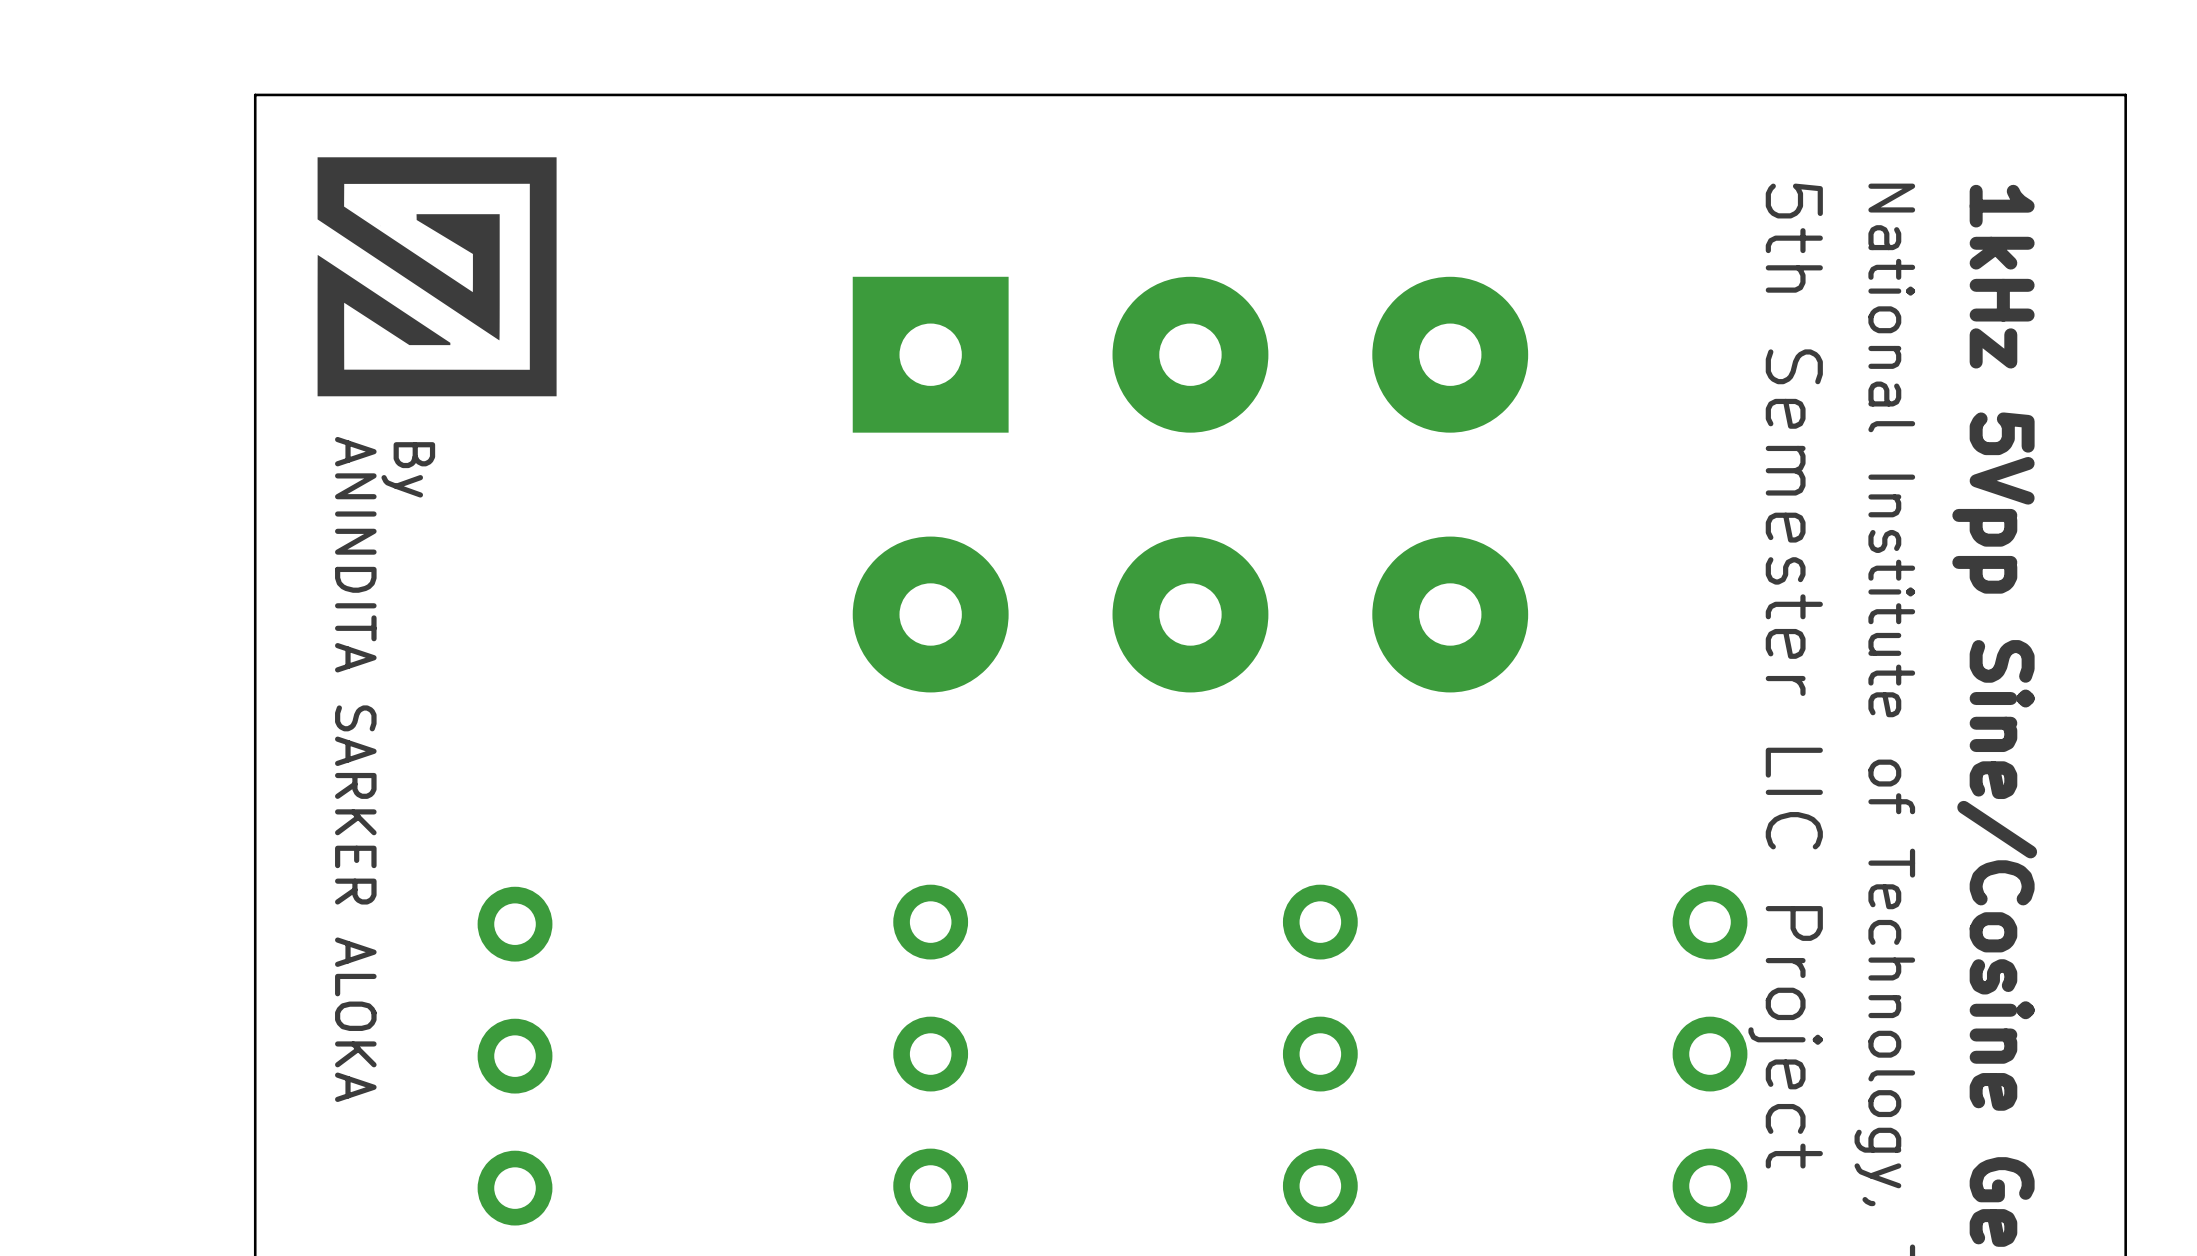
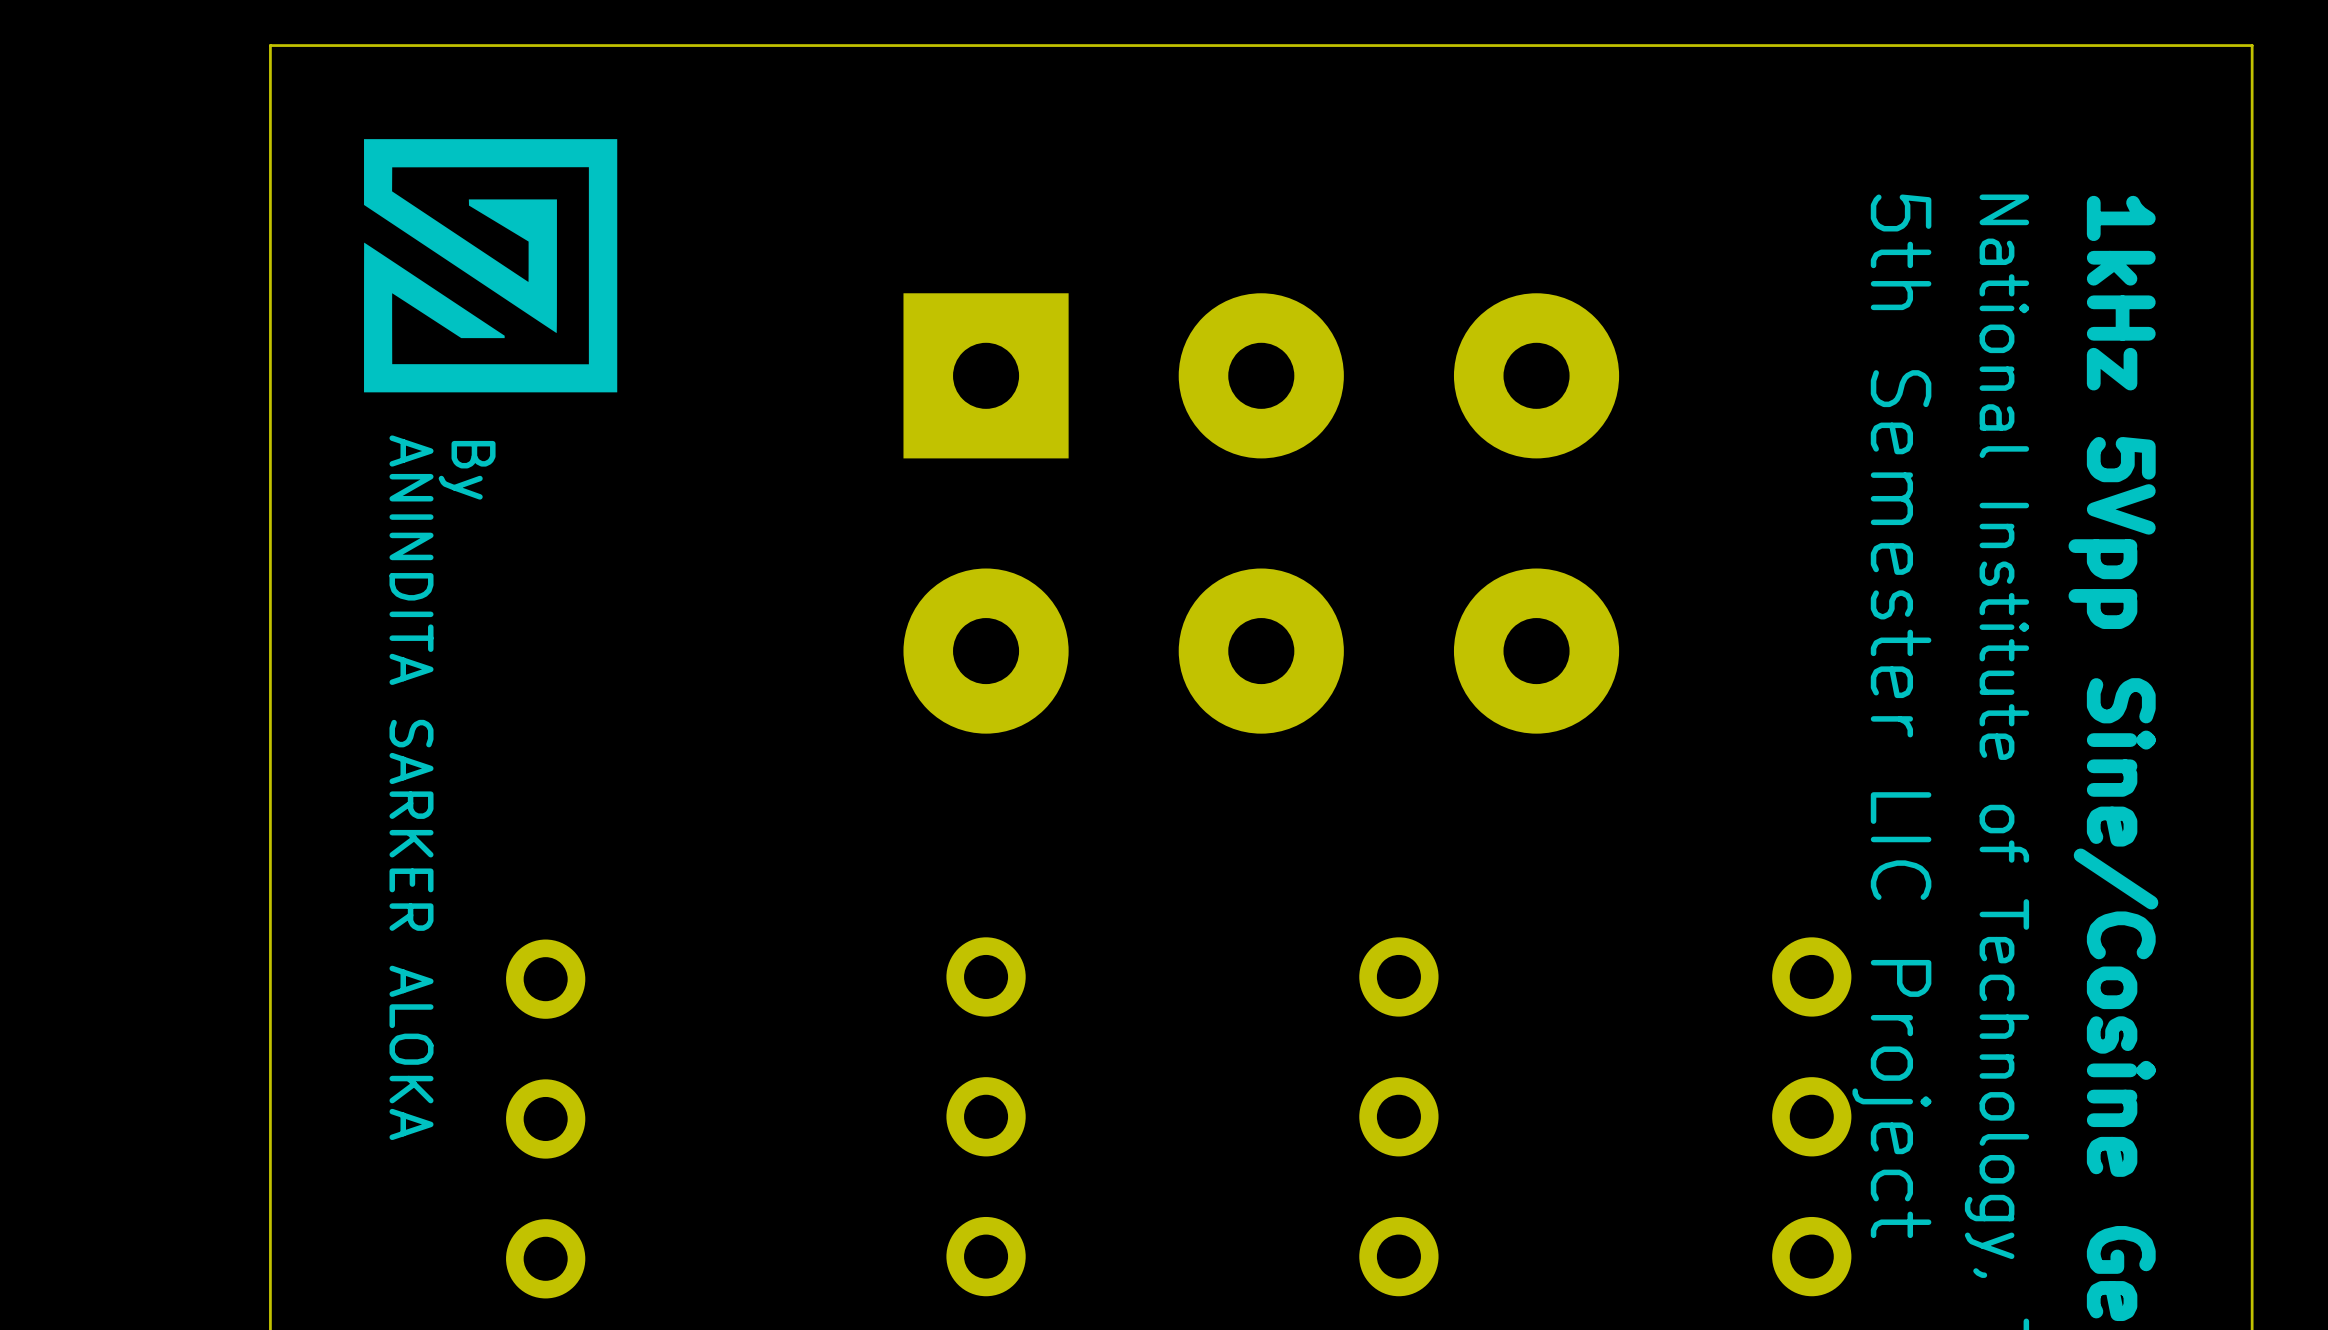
board edge: (2125, 94) (255, 94) -> (2252, 100) (2252, 45) (270, 45) (270, 100)
drawing position: (437, 276) -> (490, 265)
text position: By (408, 469) -> By (467, 470)
text position: ANINDITA SARKER ALOKA (355, 769) -> ANINDITA SARKER ALOKA (411, 787)

